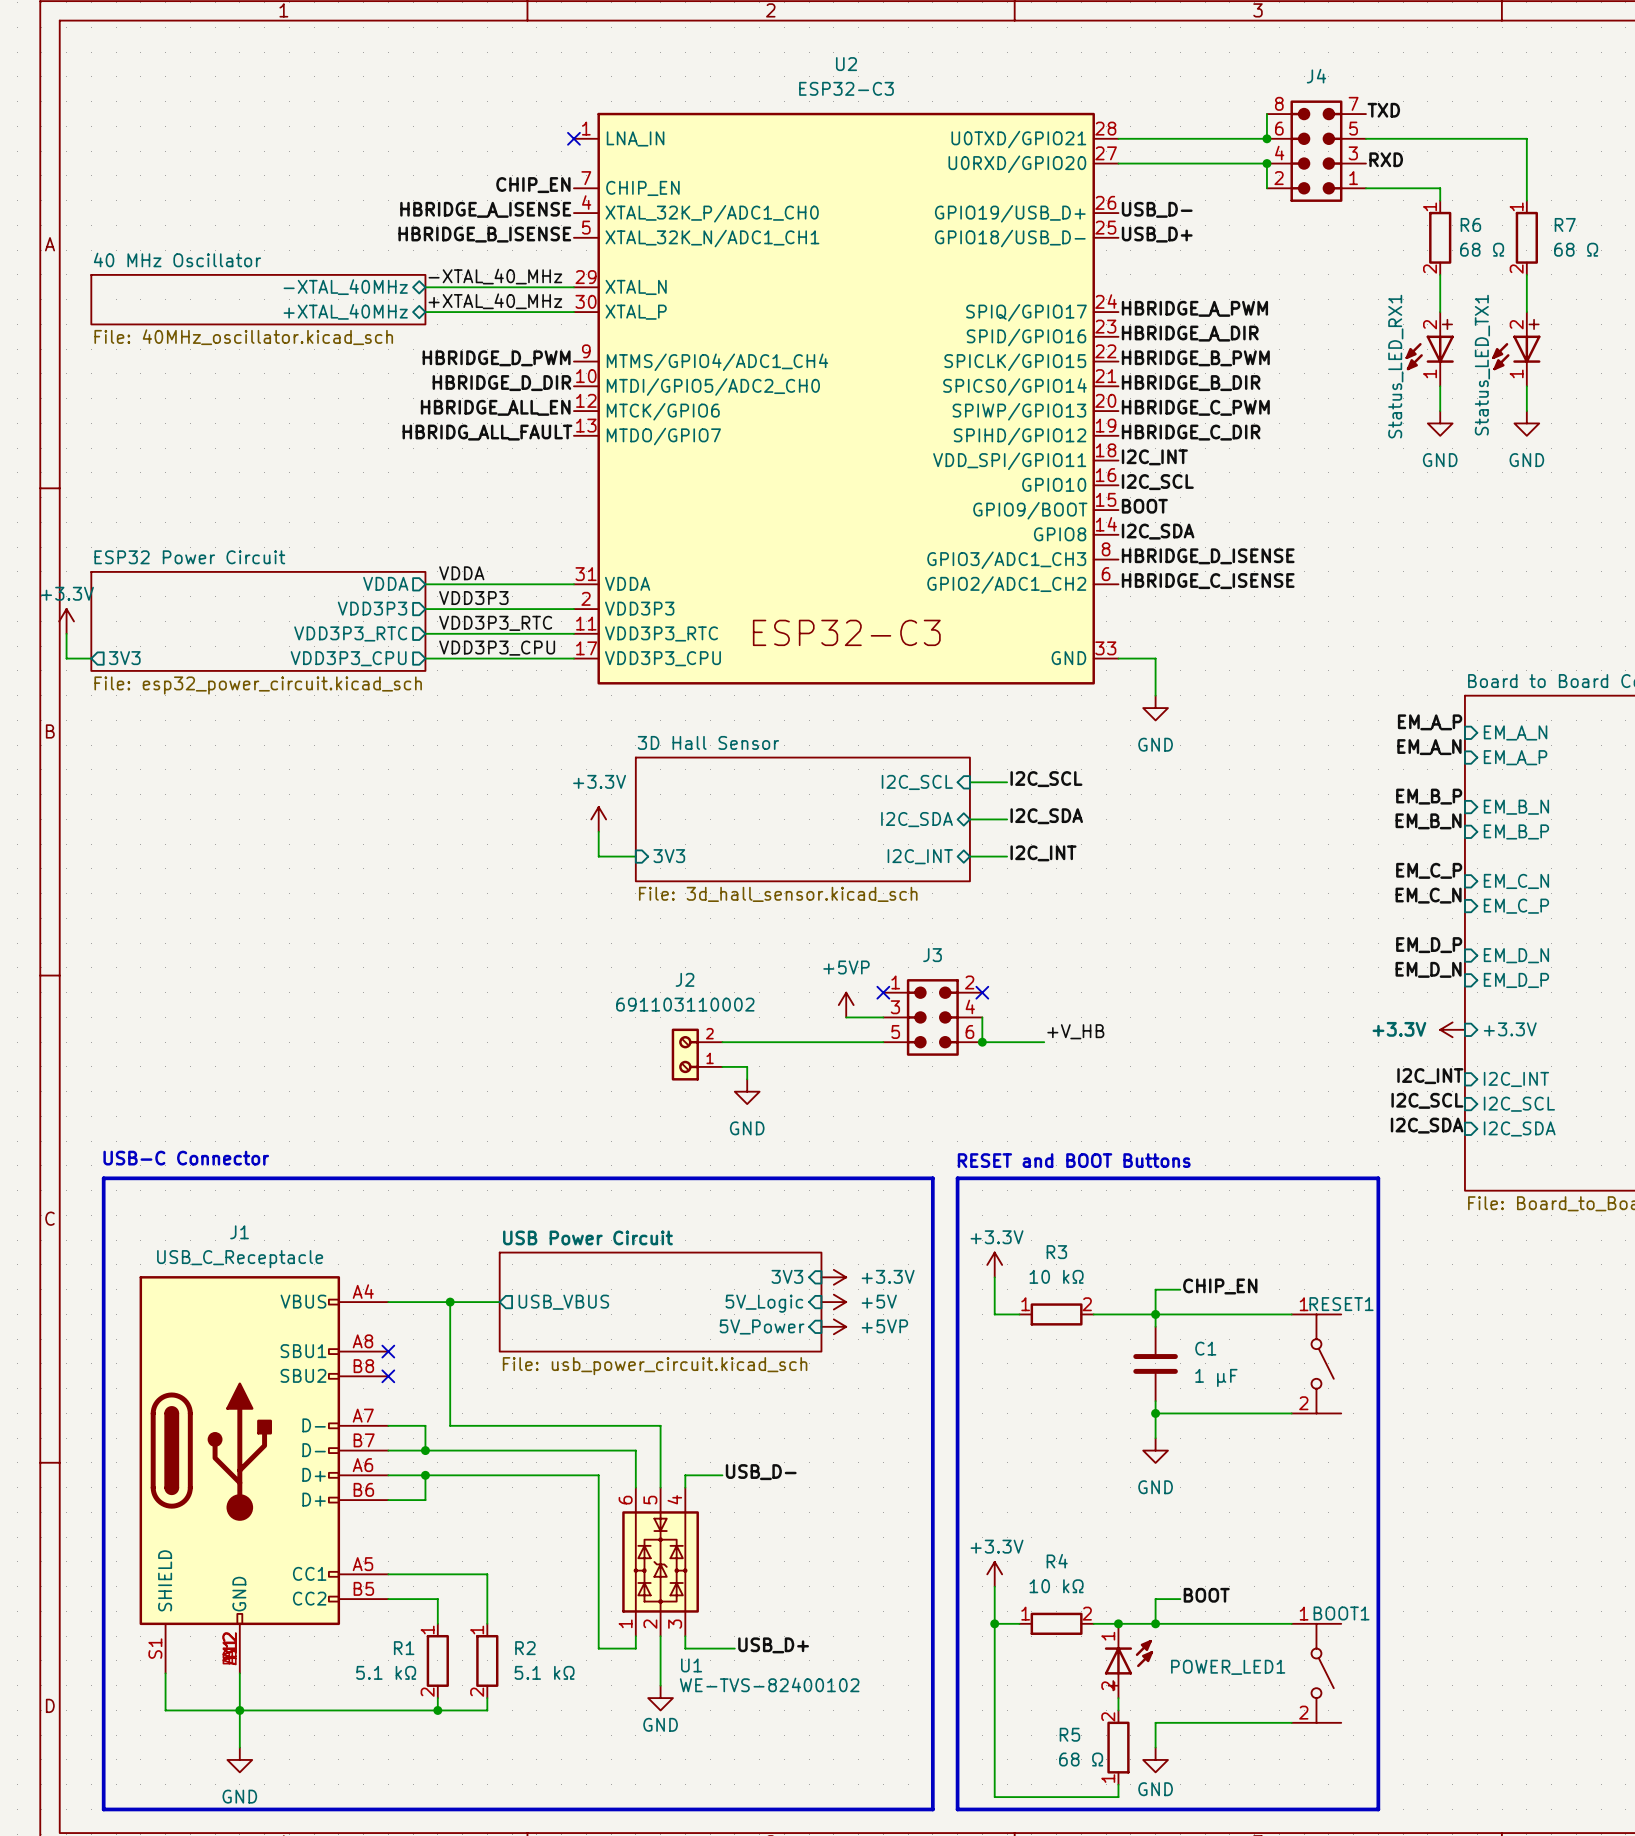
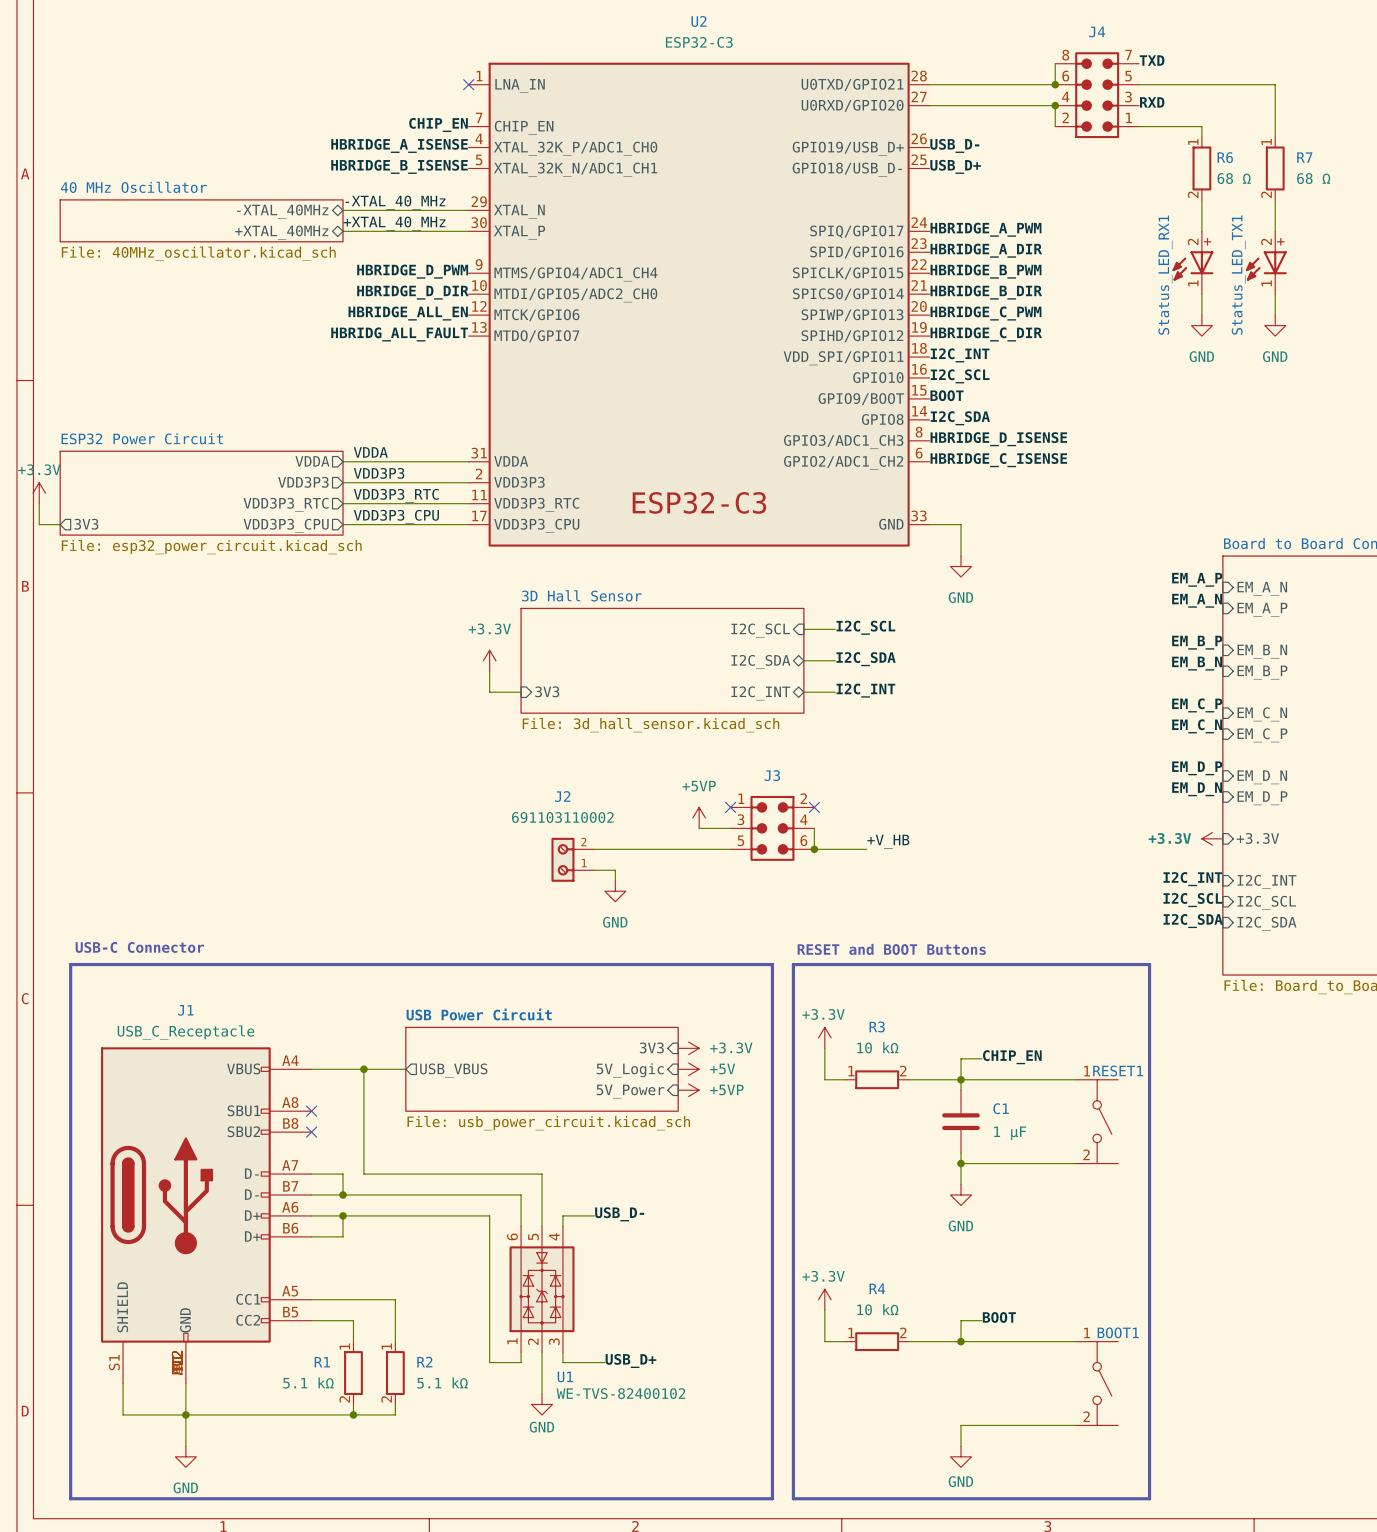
wire: (994, 1623) (994, 1797) (1118, 1797) (1118, 1784) -> none
junction: (994, 1623) -> none
junction: (1118, 1623) -> none
POWER_LED1: (1128, 1660) -> none
wire: (1118, 1698) (1118, 1710) -> none
R5: (1118, 1747) -> none

